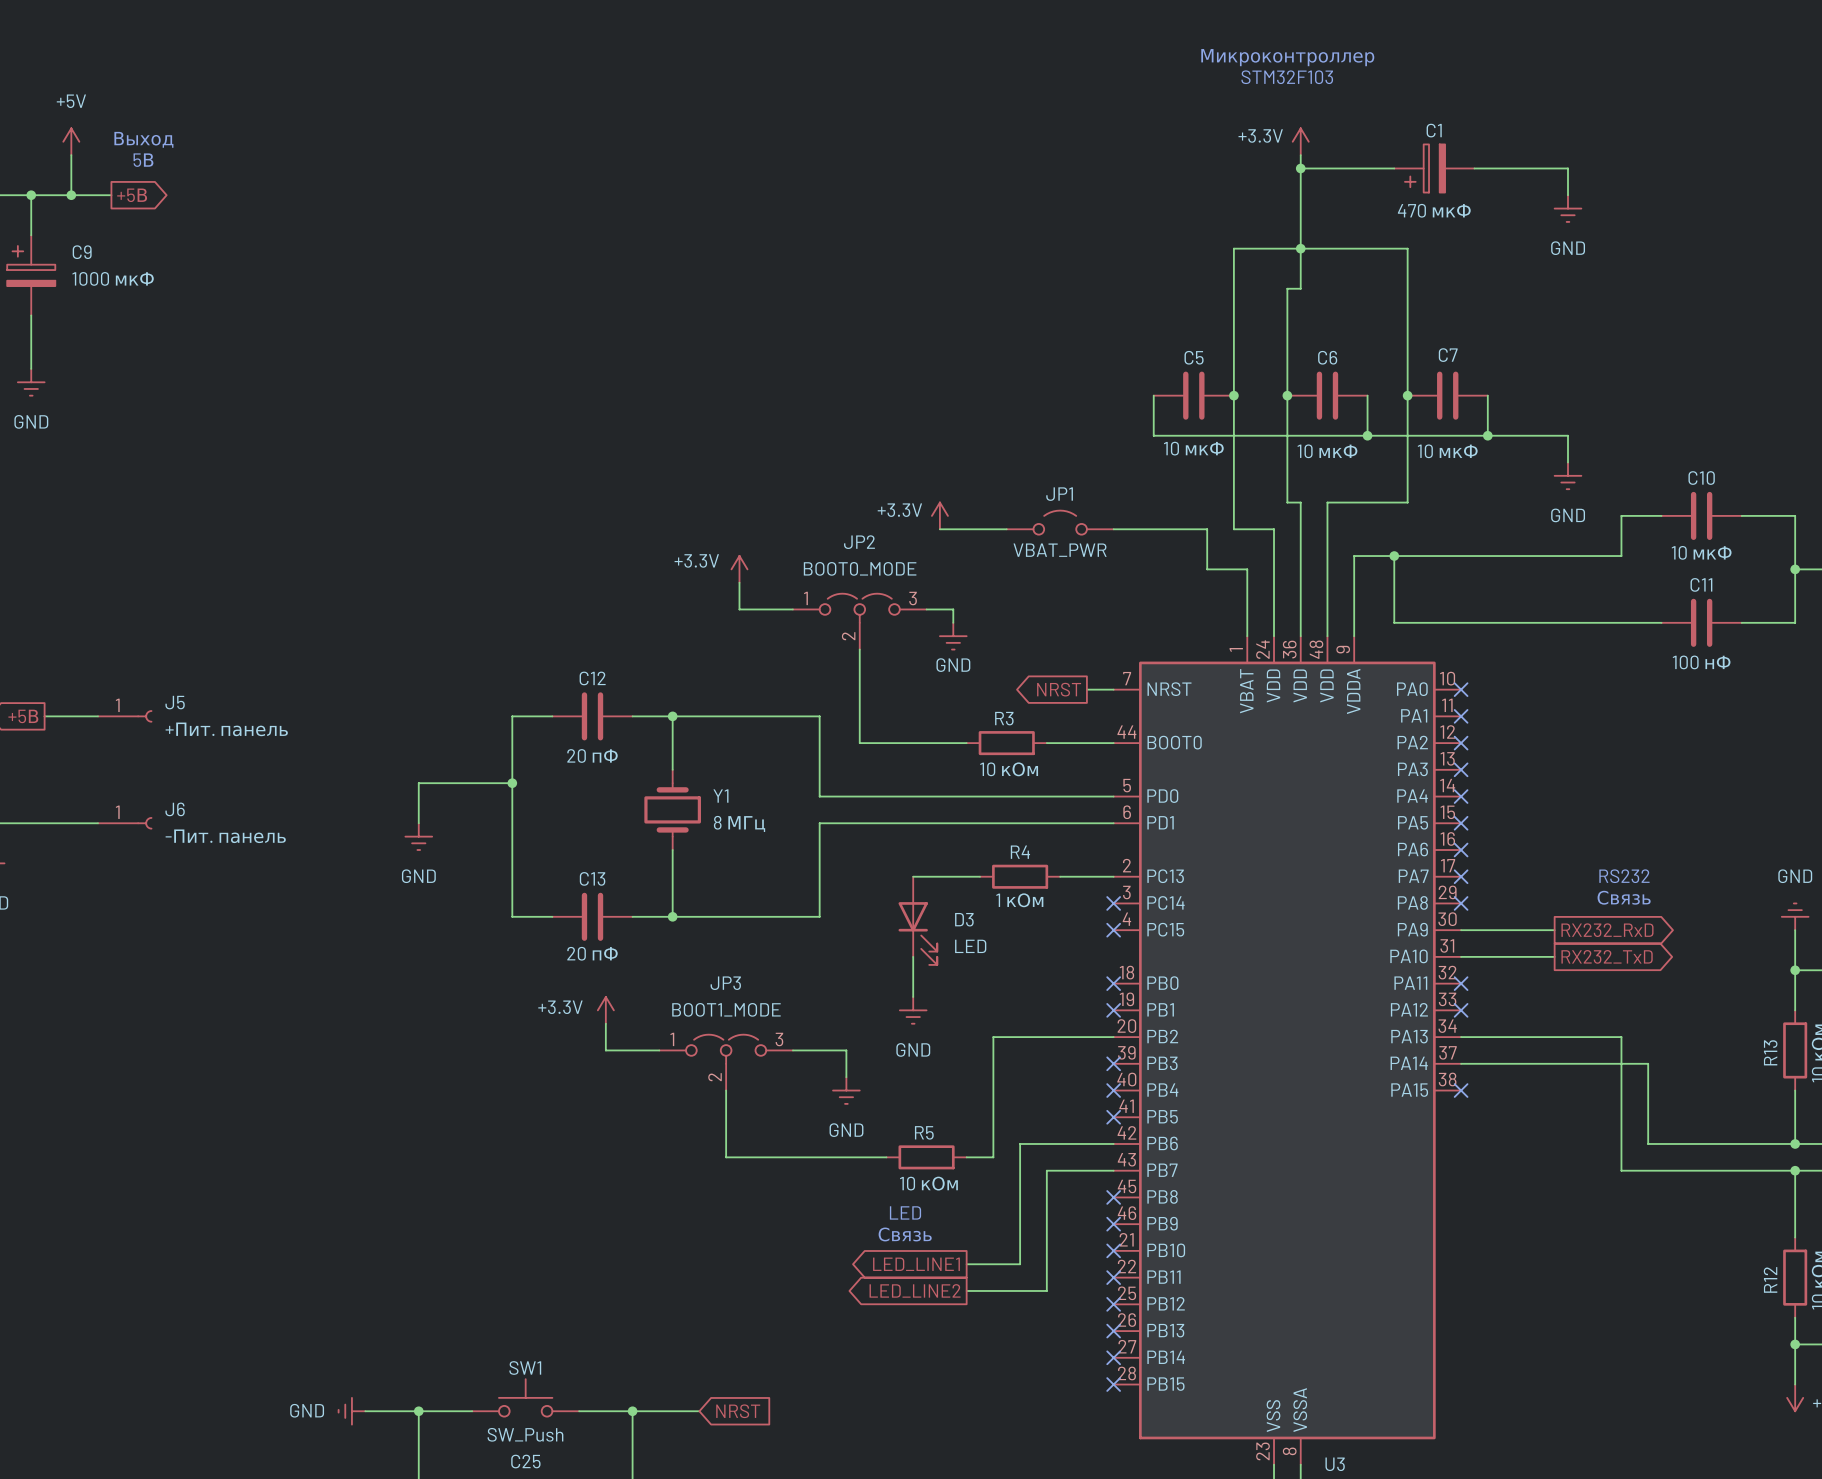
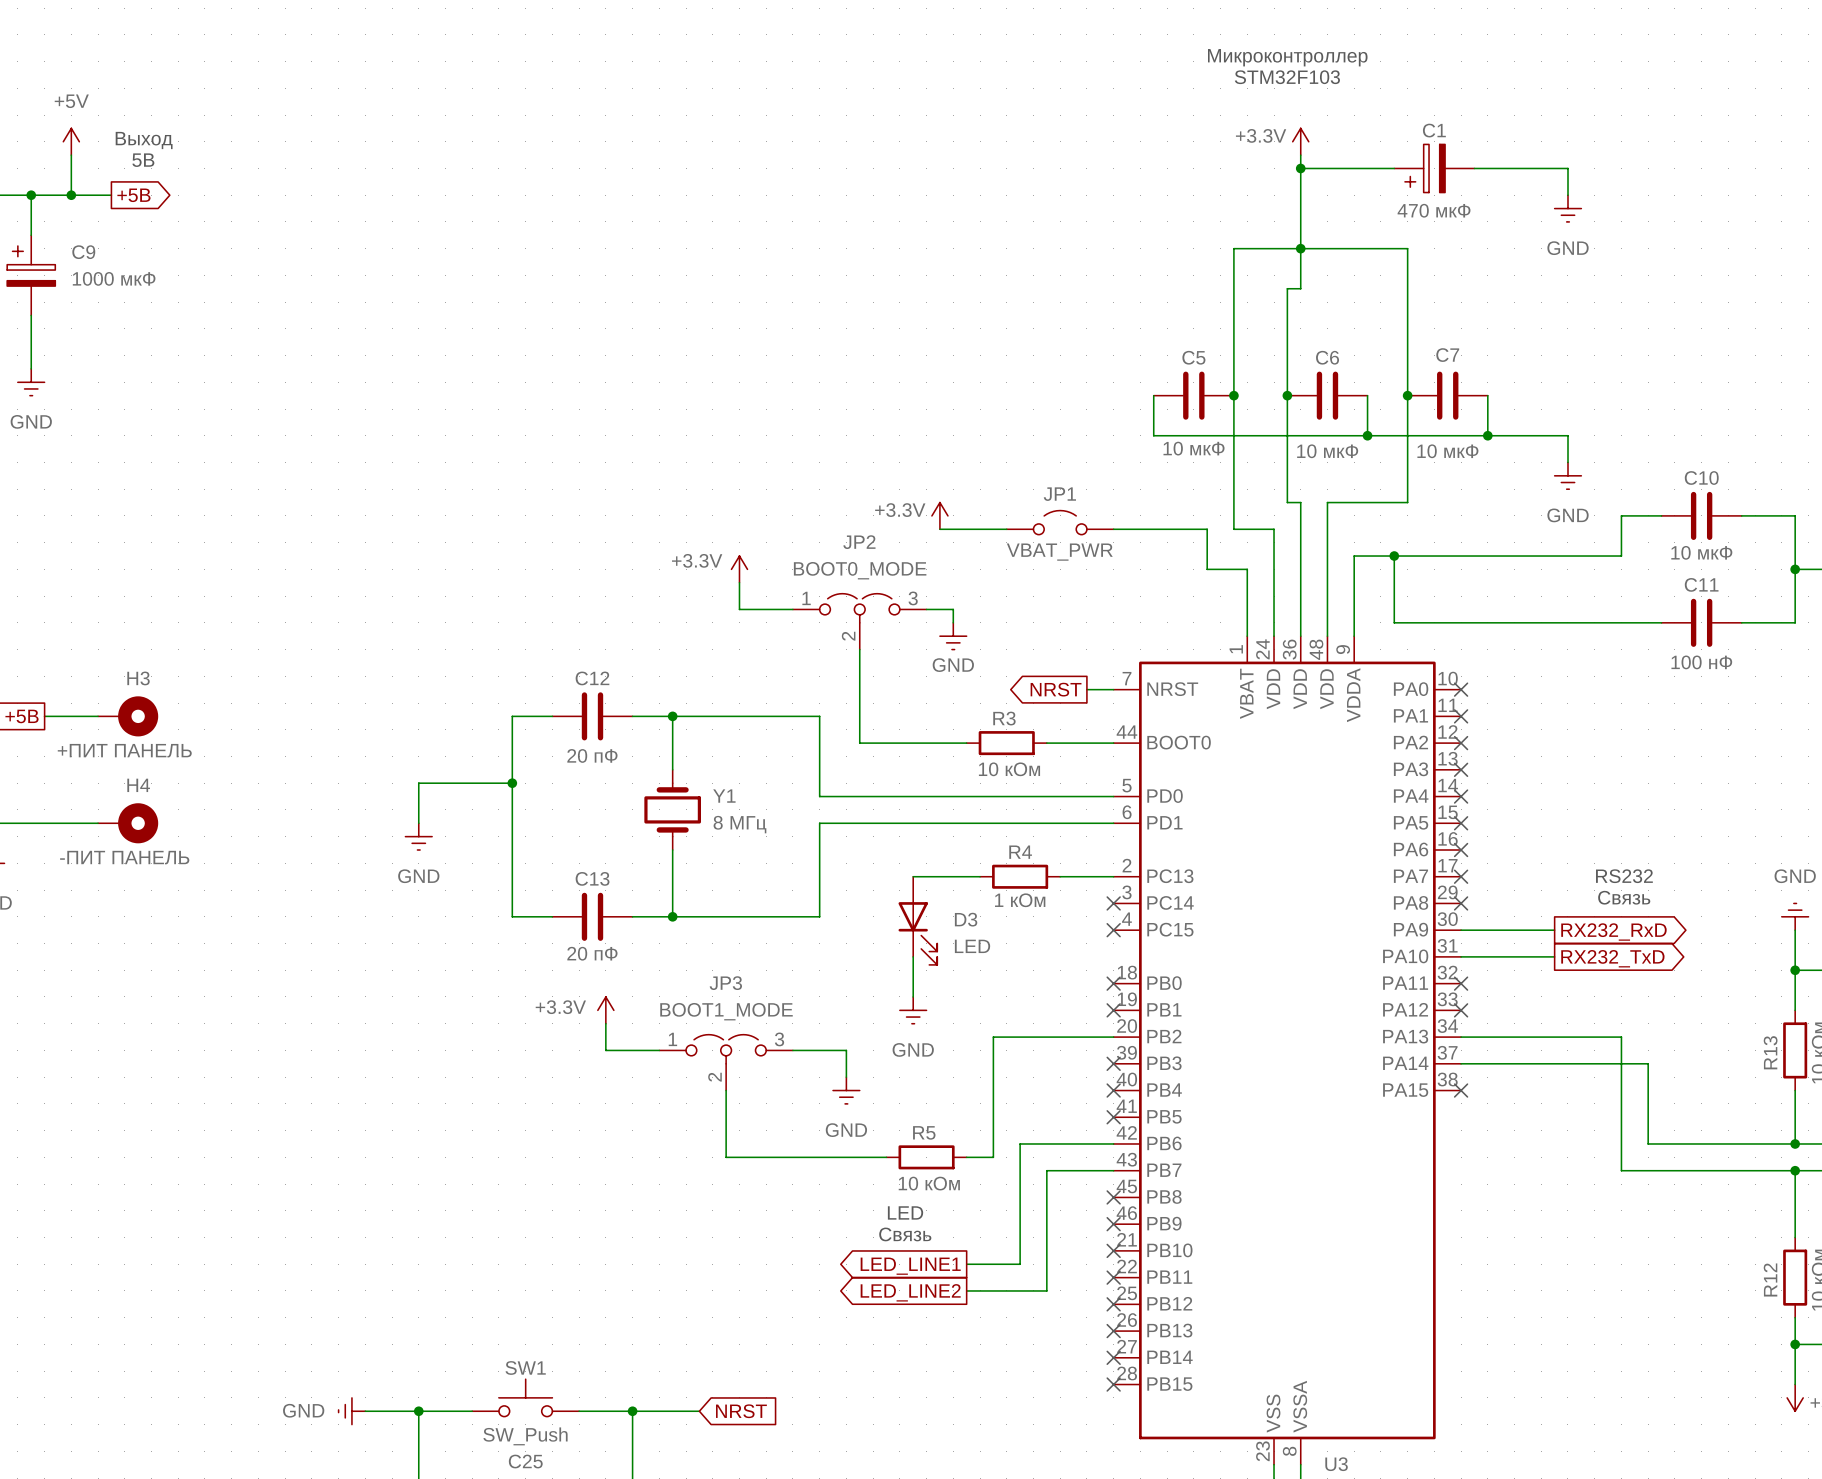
J5: +Пит. панель (125, 716) -> none
H3: none -> +ПИТ ПАНЕЛЬ (128, 716)
J6: -Пит. панель (125, 823) -> none
H4: none -> -ПИТ ПАНЕЛЬ (128, 823)

